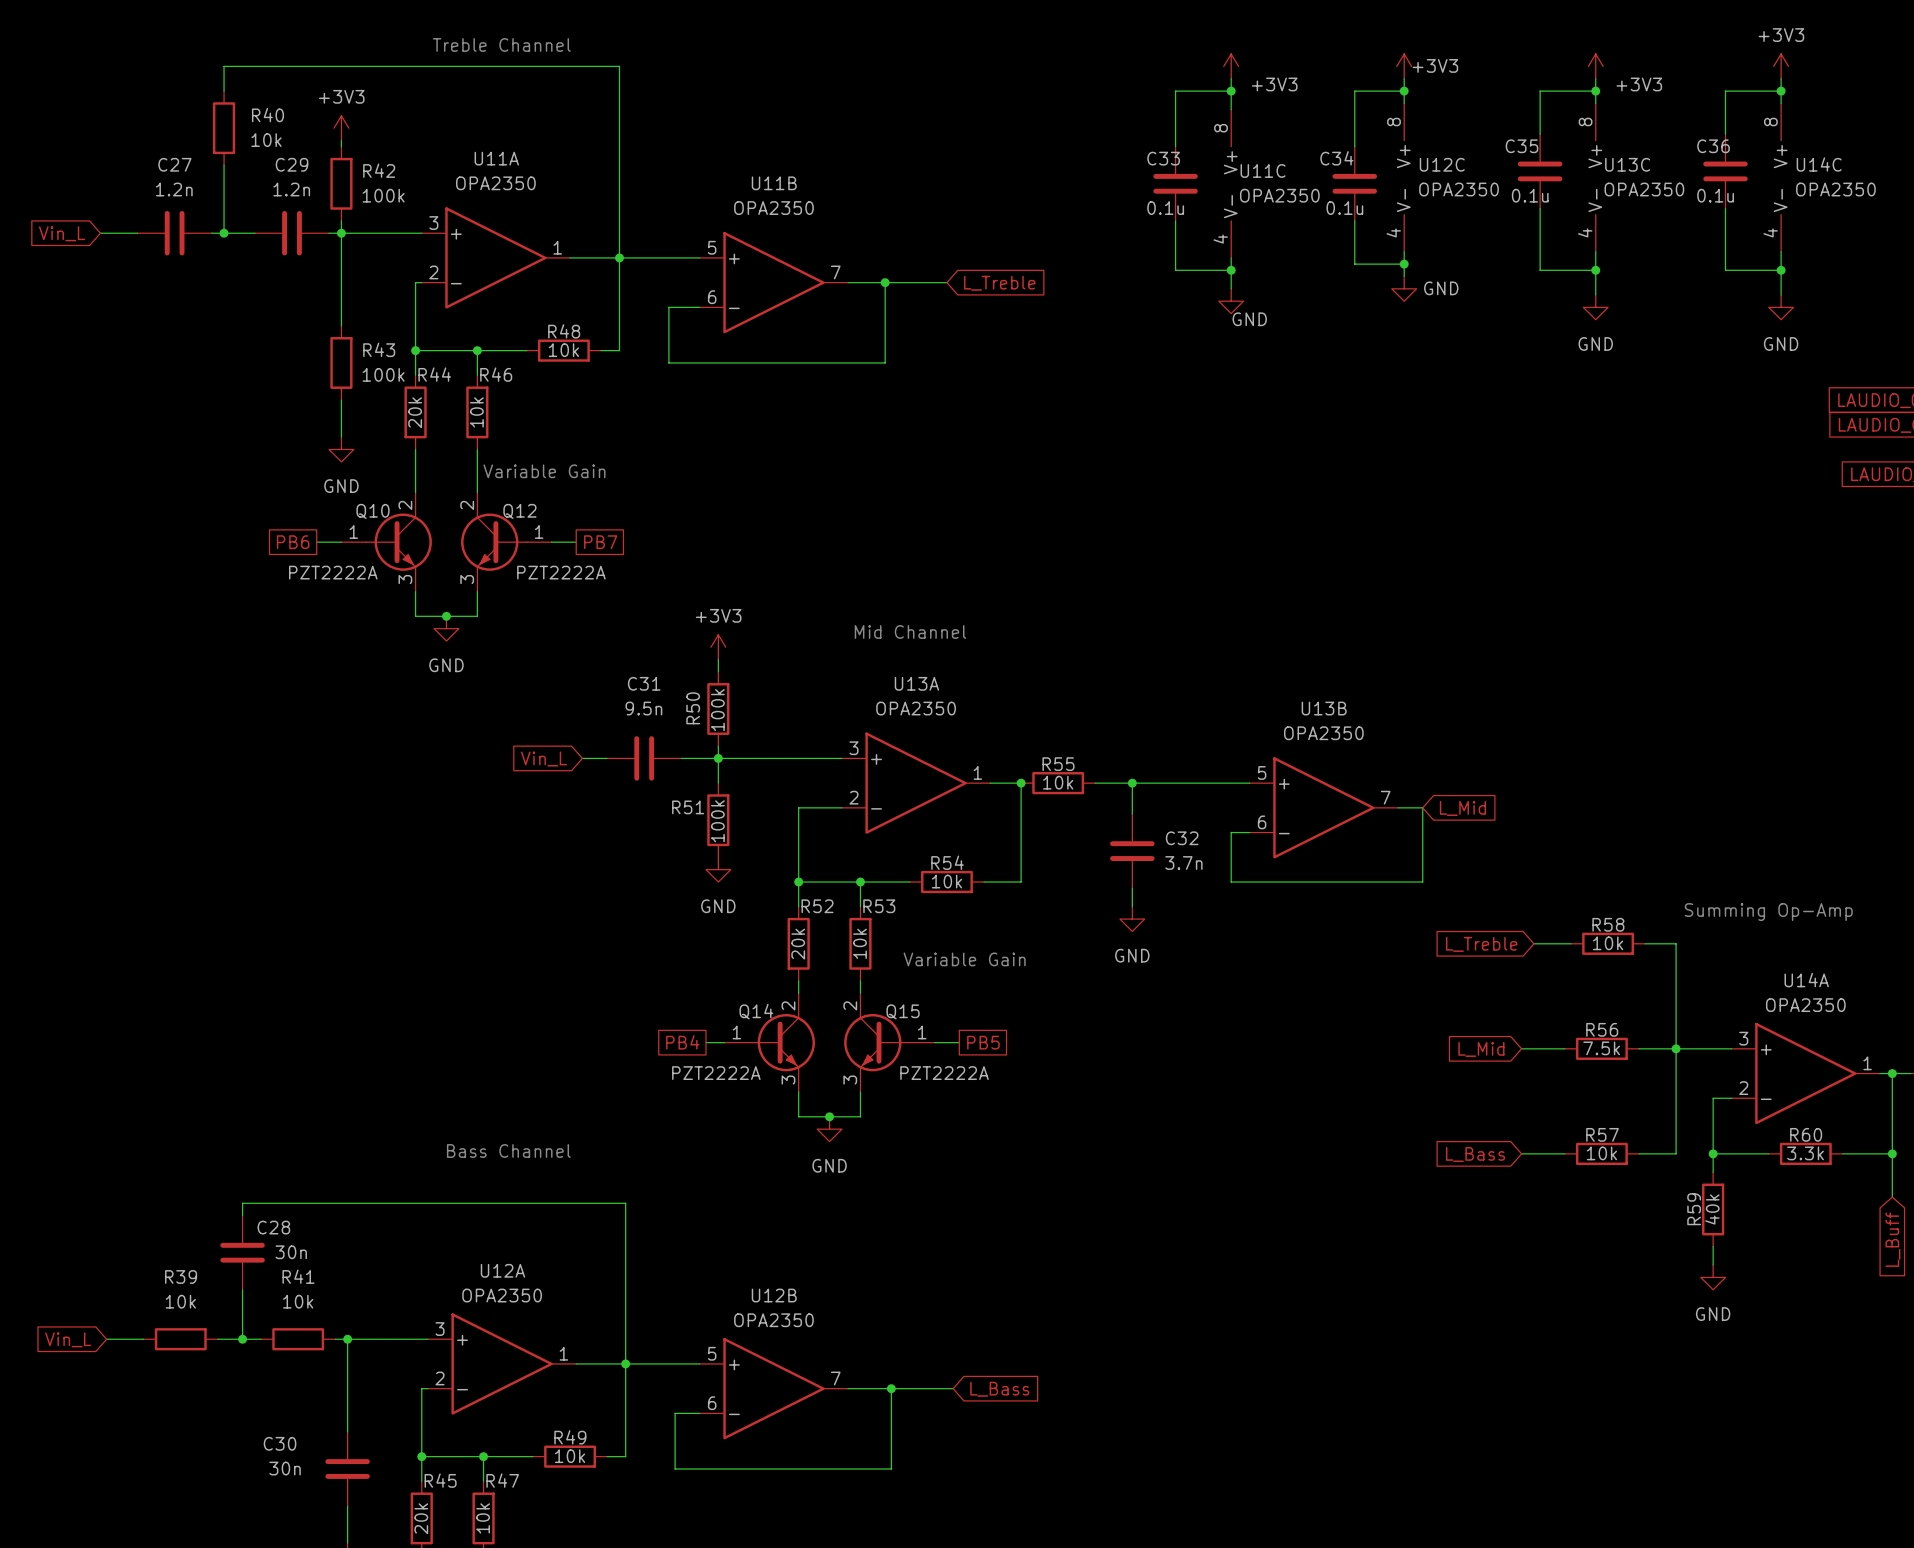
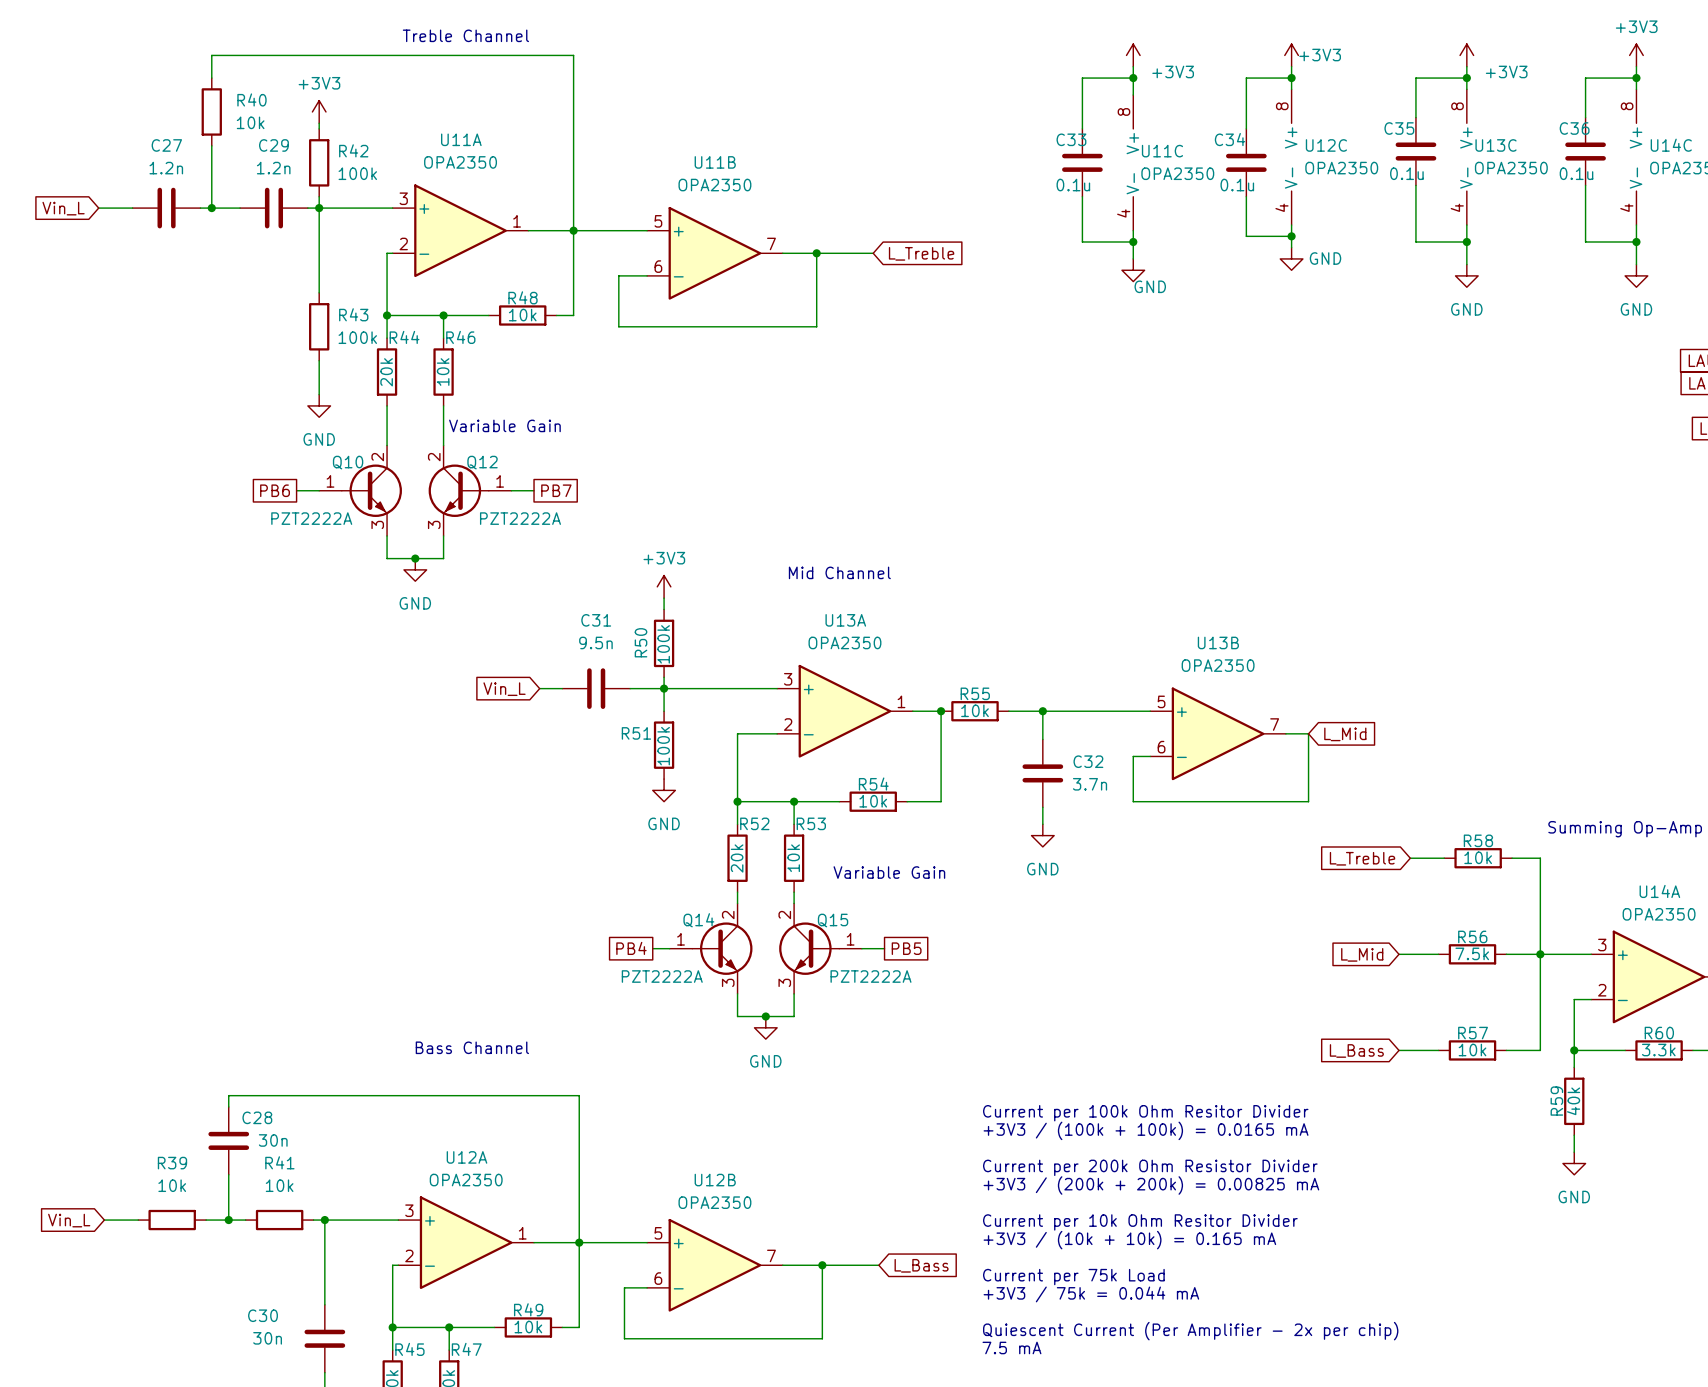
text: none -> Current per 100k Ohm Resitor Divider (1145, 1113)
text: none -> +3V3 / (100k + 100k) = 0.0165 mA (1146, 1130)
text: none -> Current per 200k Ohm Resistor Divider (1150, 1167)
text: none -> +3V3 / (200k + 200k) = 0.00825 mA (1151, 1185)
text: none -> Current per 10k Ohm Resitor Divider (1140, 1222)
text: none -> +3V3 / (10k + 10k) = 0.165 mA (1129, 1240)
text: none -> Current per 75k Load (1073, 1277)
text: none -> +3V3 / 75k = 0.044 mA (1091, 1294)
text: none -> Quiescent Current (Per Amplifier - 2x per chip) (1190, 1331)
text: none -> 7.5 mA (1011, 1347)

